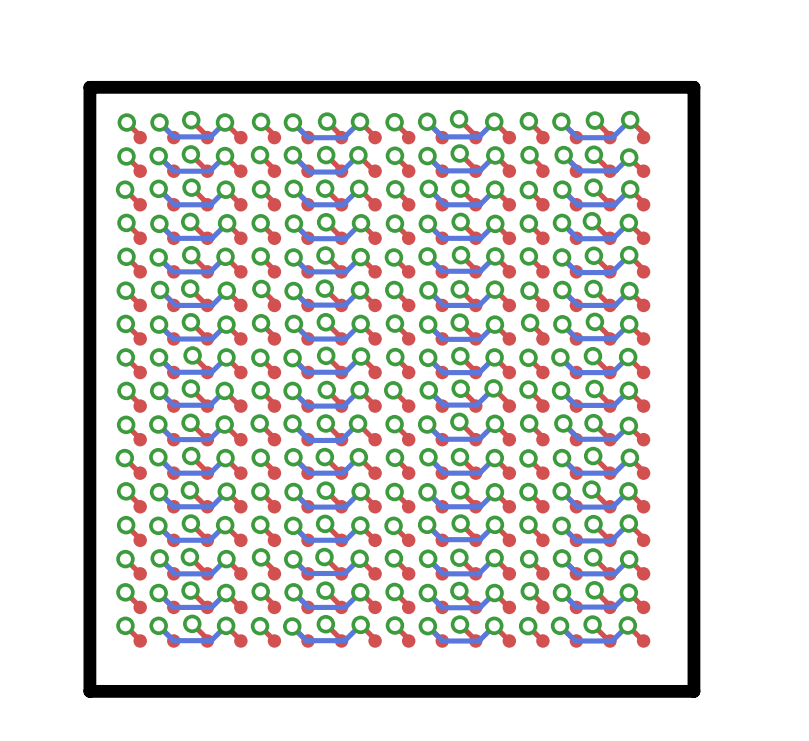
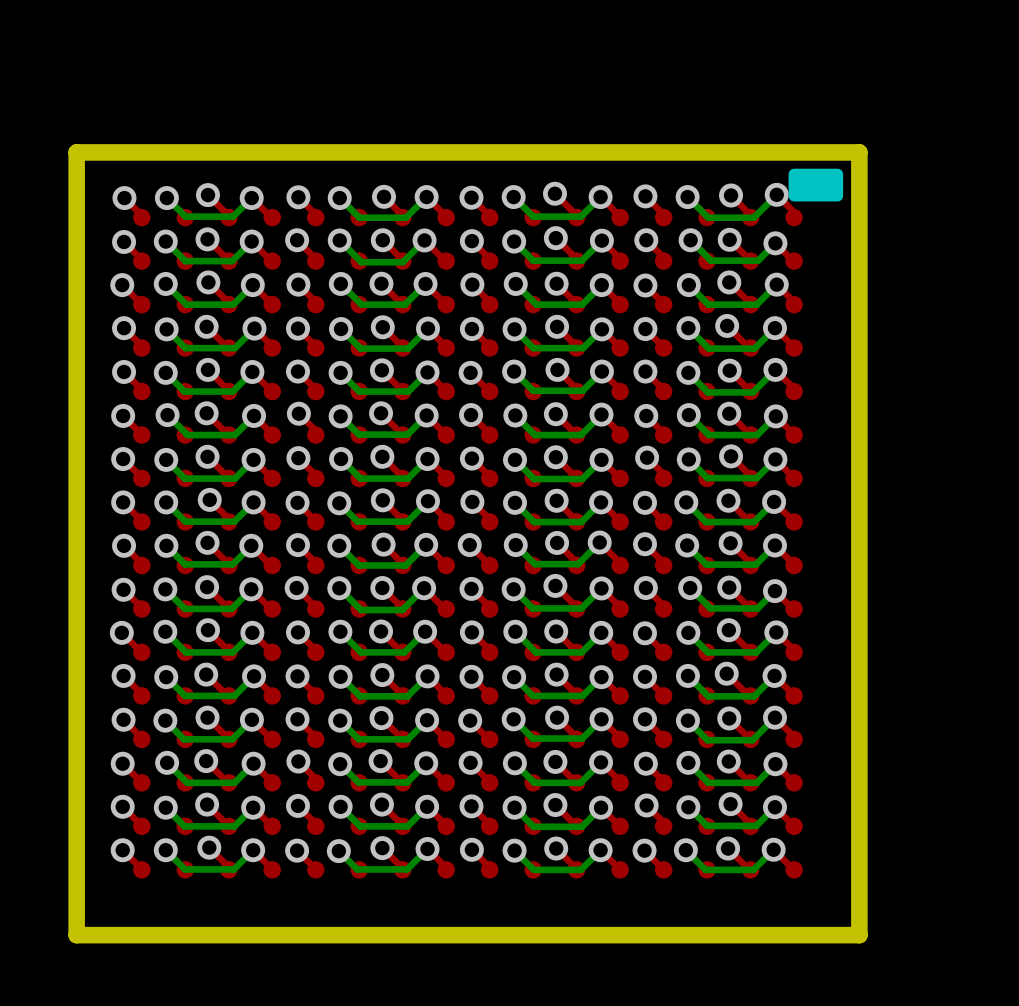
drawing: none -> [788, 168, 844, 202]

